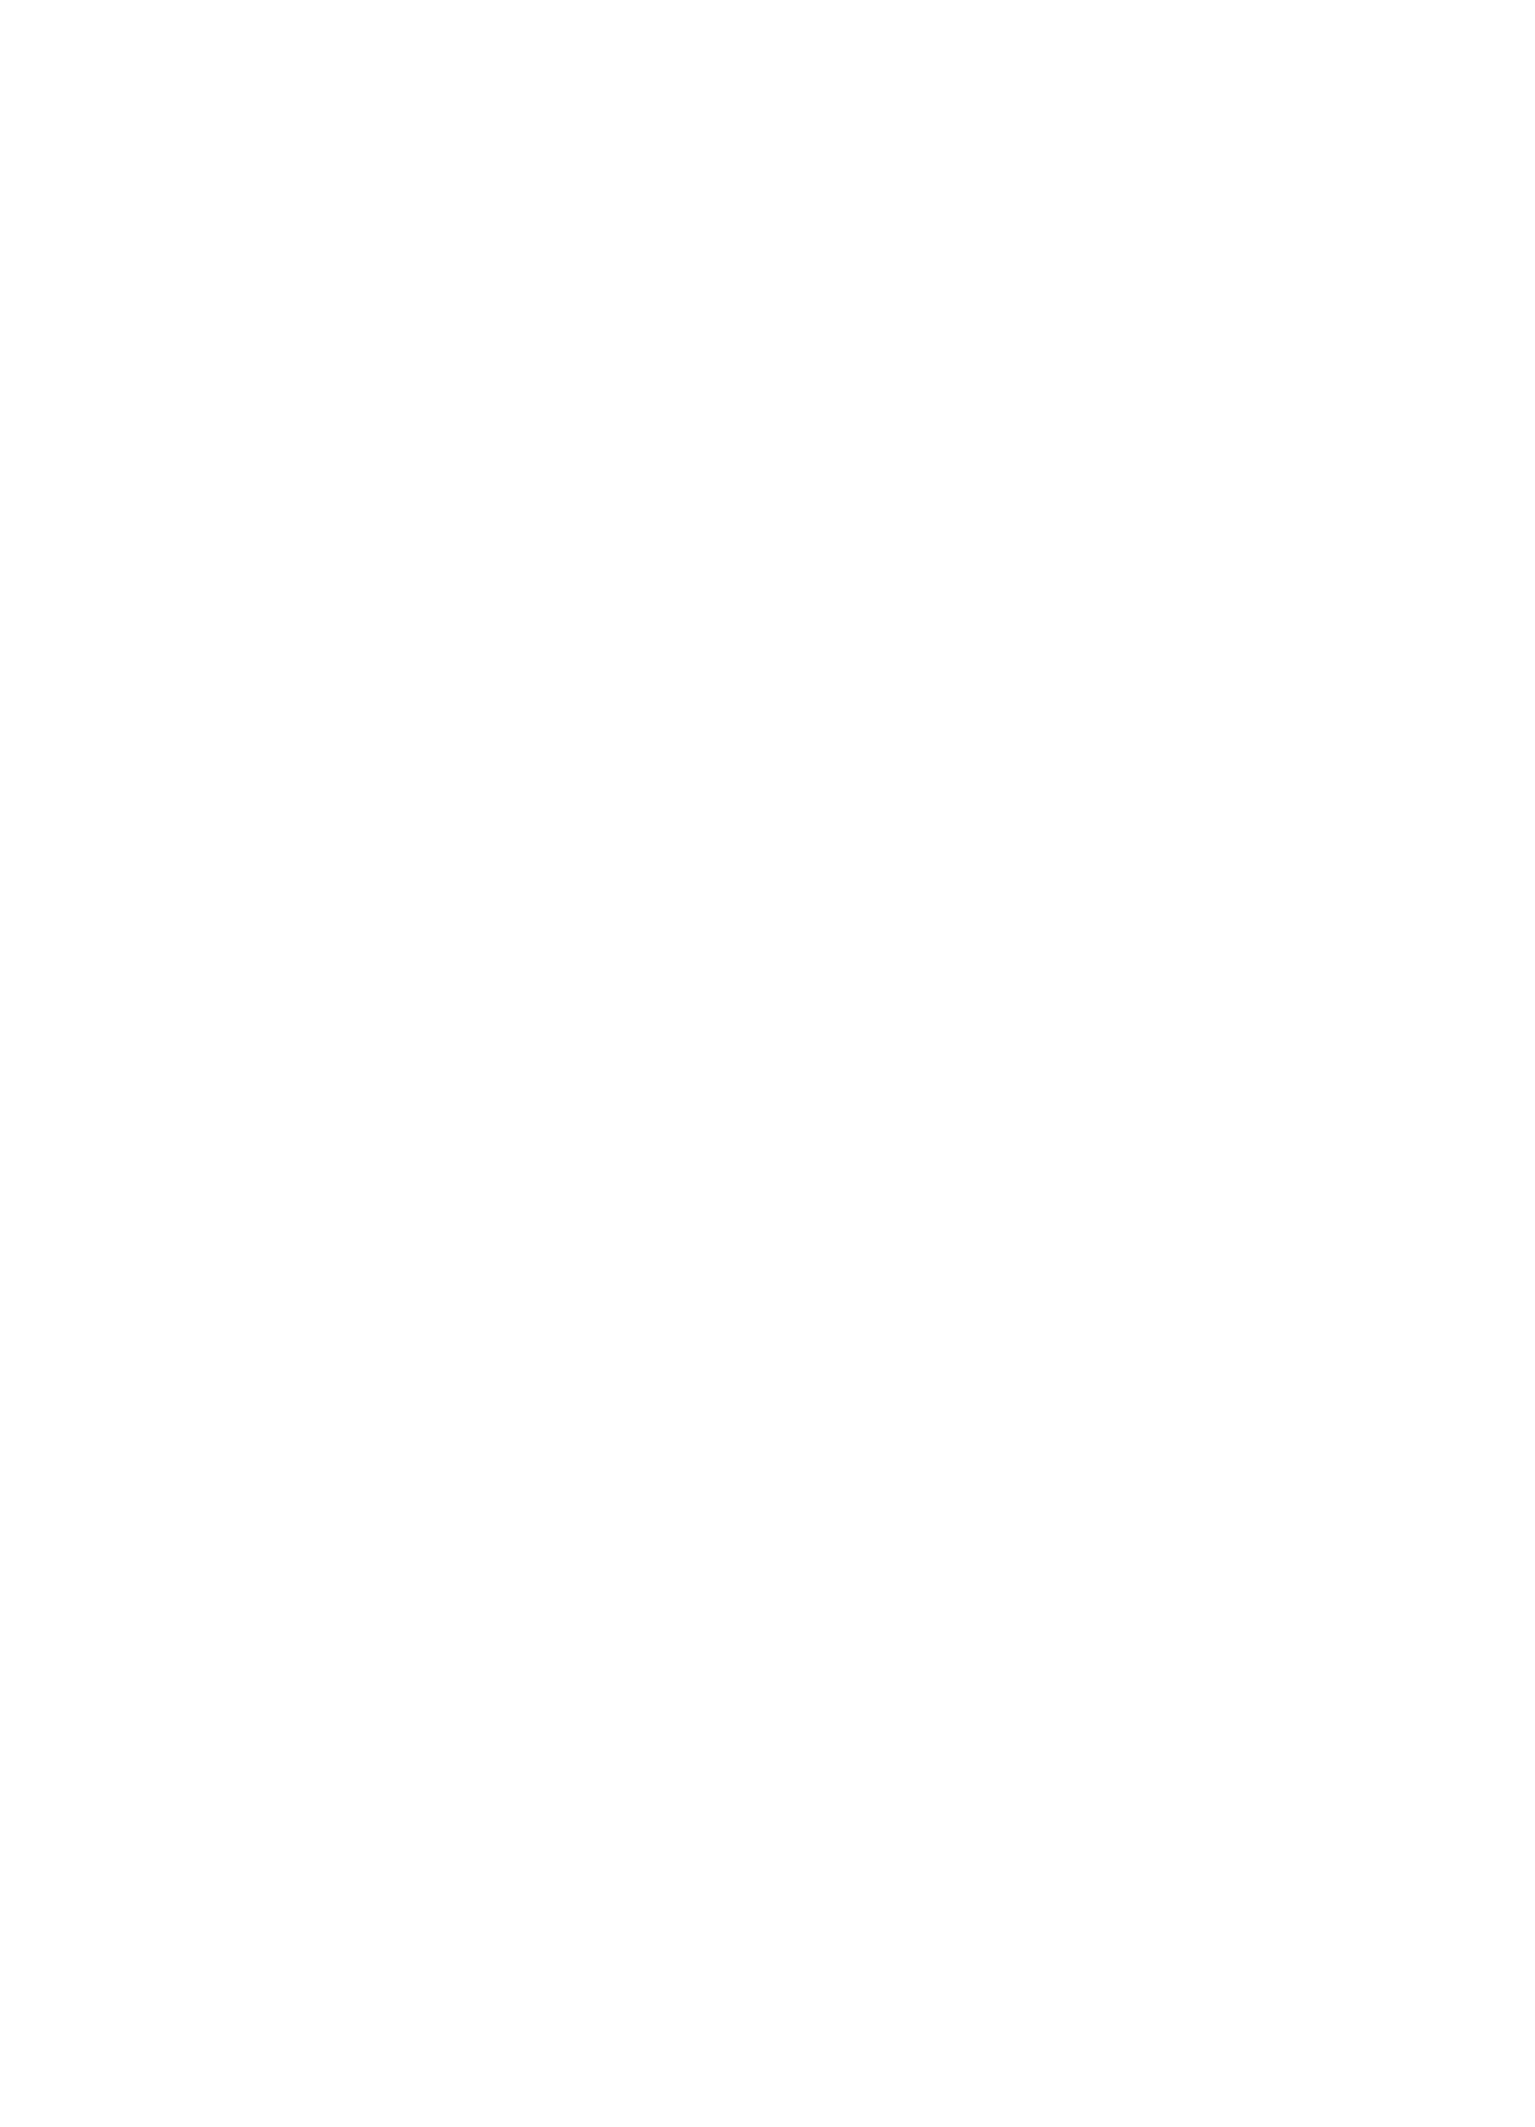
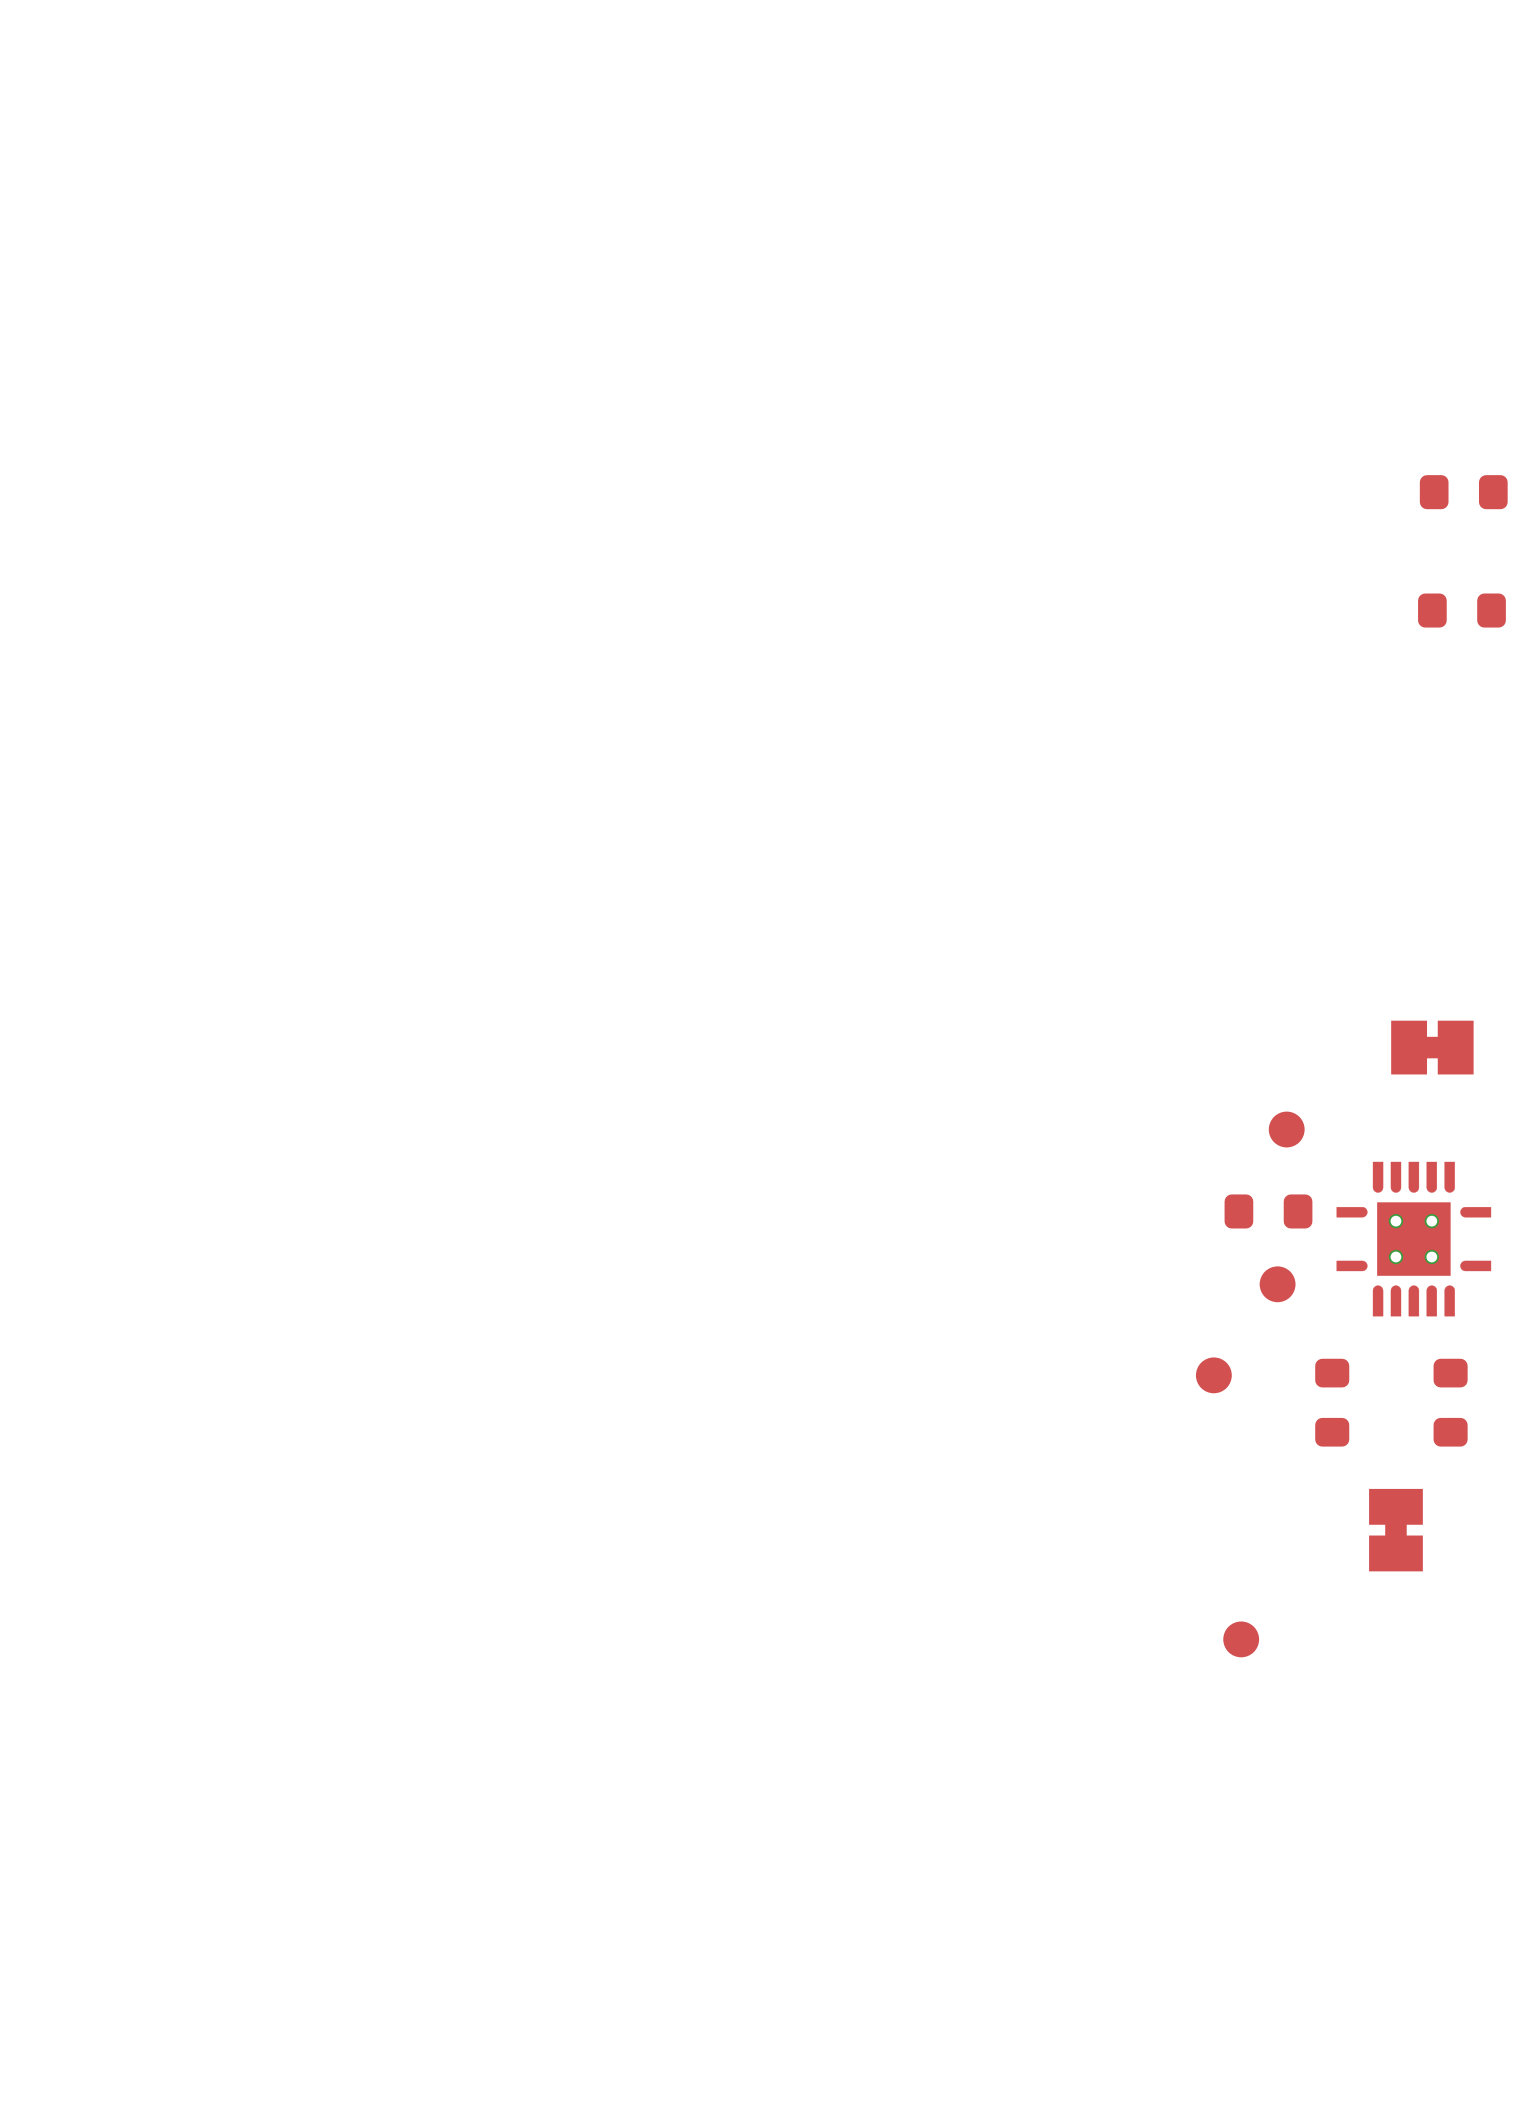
part: none -> (1463, 492)
part: none -> (1461, 610)
part: none -> (1432, 1047)
part: none -> (1286, 1129)
part: none -> (1268, 1211)
part: none -> (1413, 1239)
part: none -> (1277, 1284)
part: none -> (1213, 1375)
part: none -> (1332, 1402)
part: none -> (1450, 1402)
part: none -> (1395, 1530)
part: none -> (1241, 1639)

